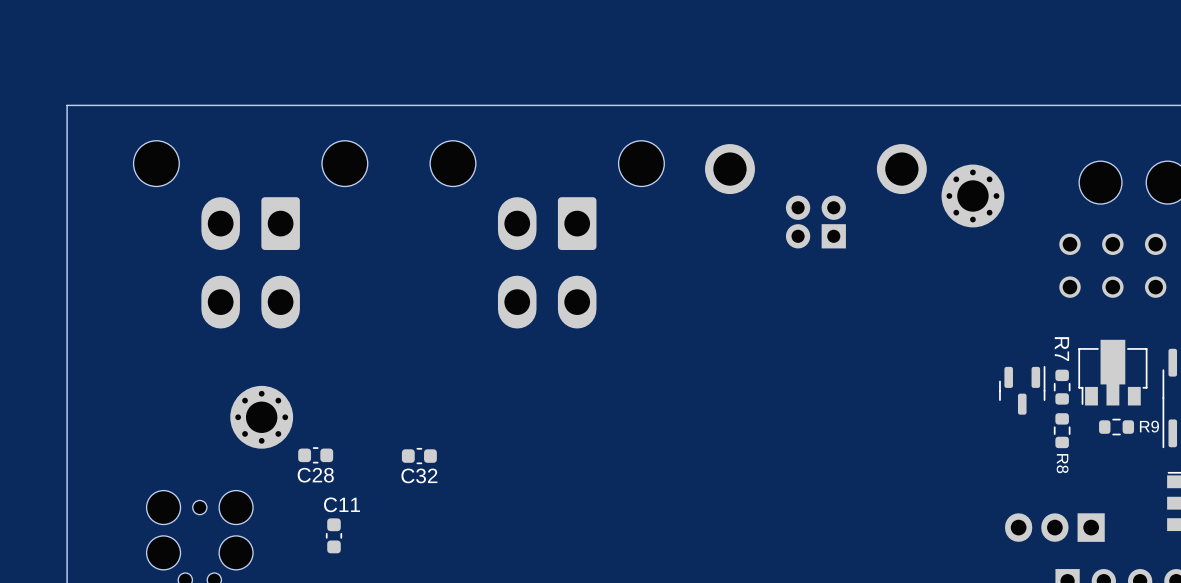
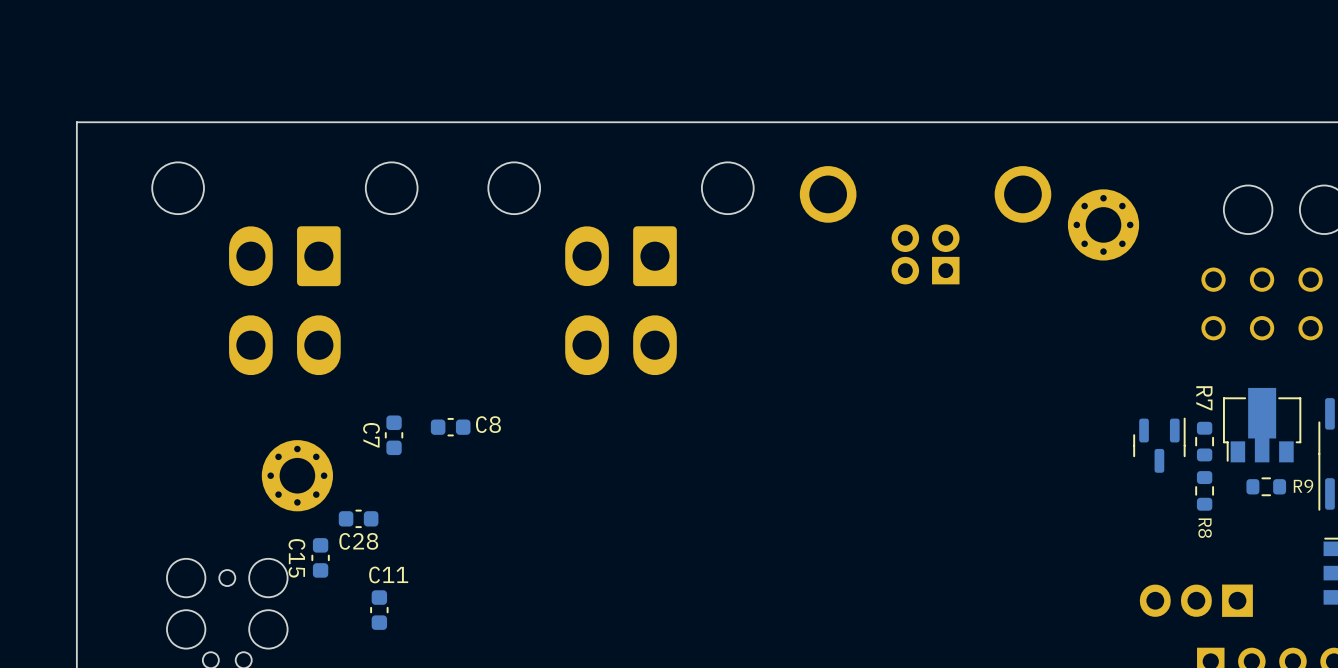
C8: none -> (450, 427)
C7: none -> (394, 435)
C32: (419, 456) -> none
C15: none -> (320, 557)

